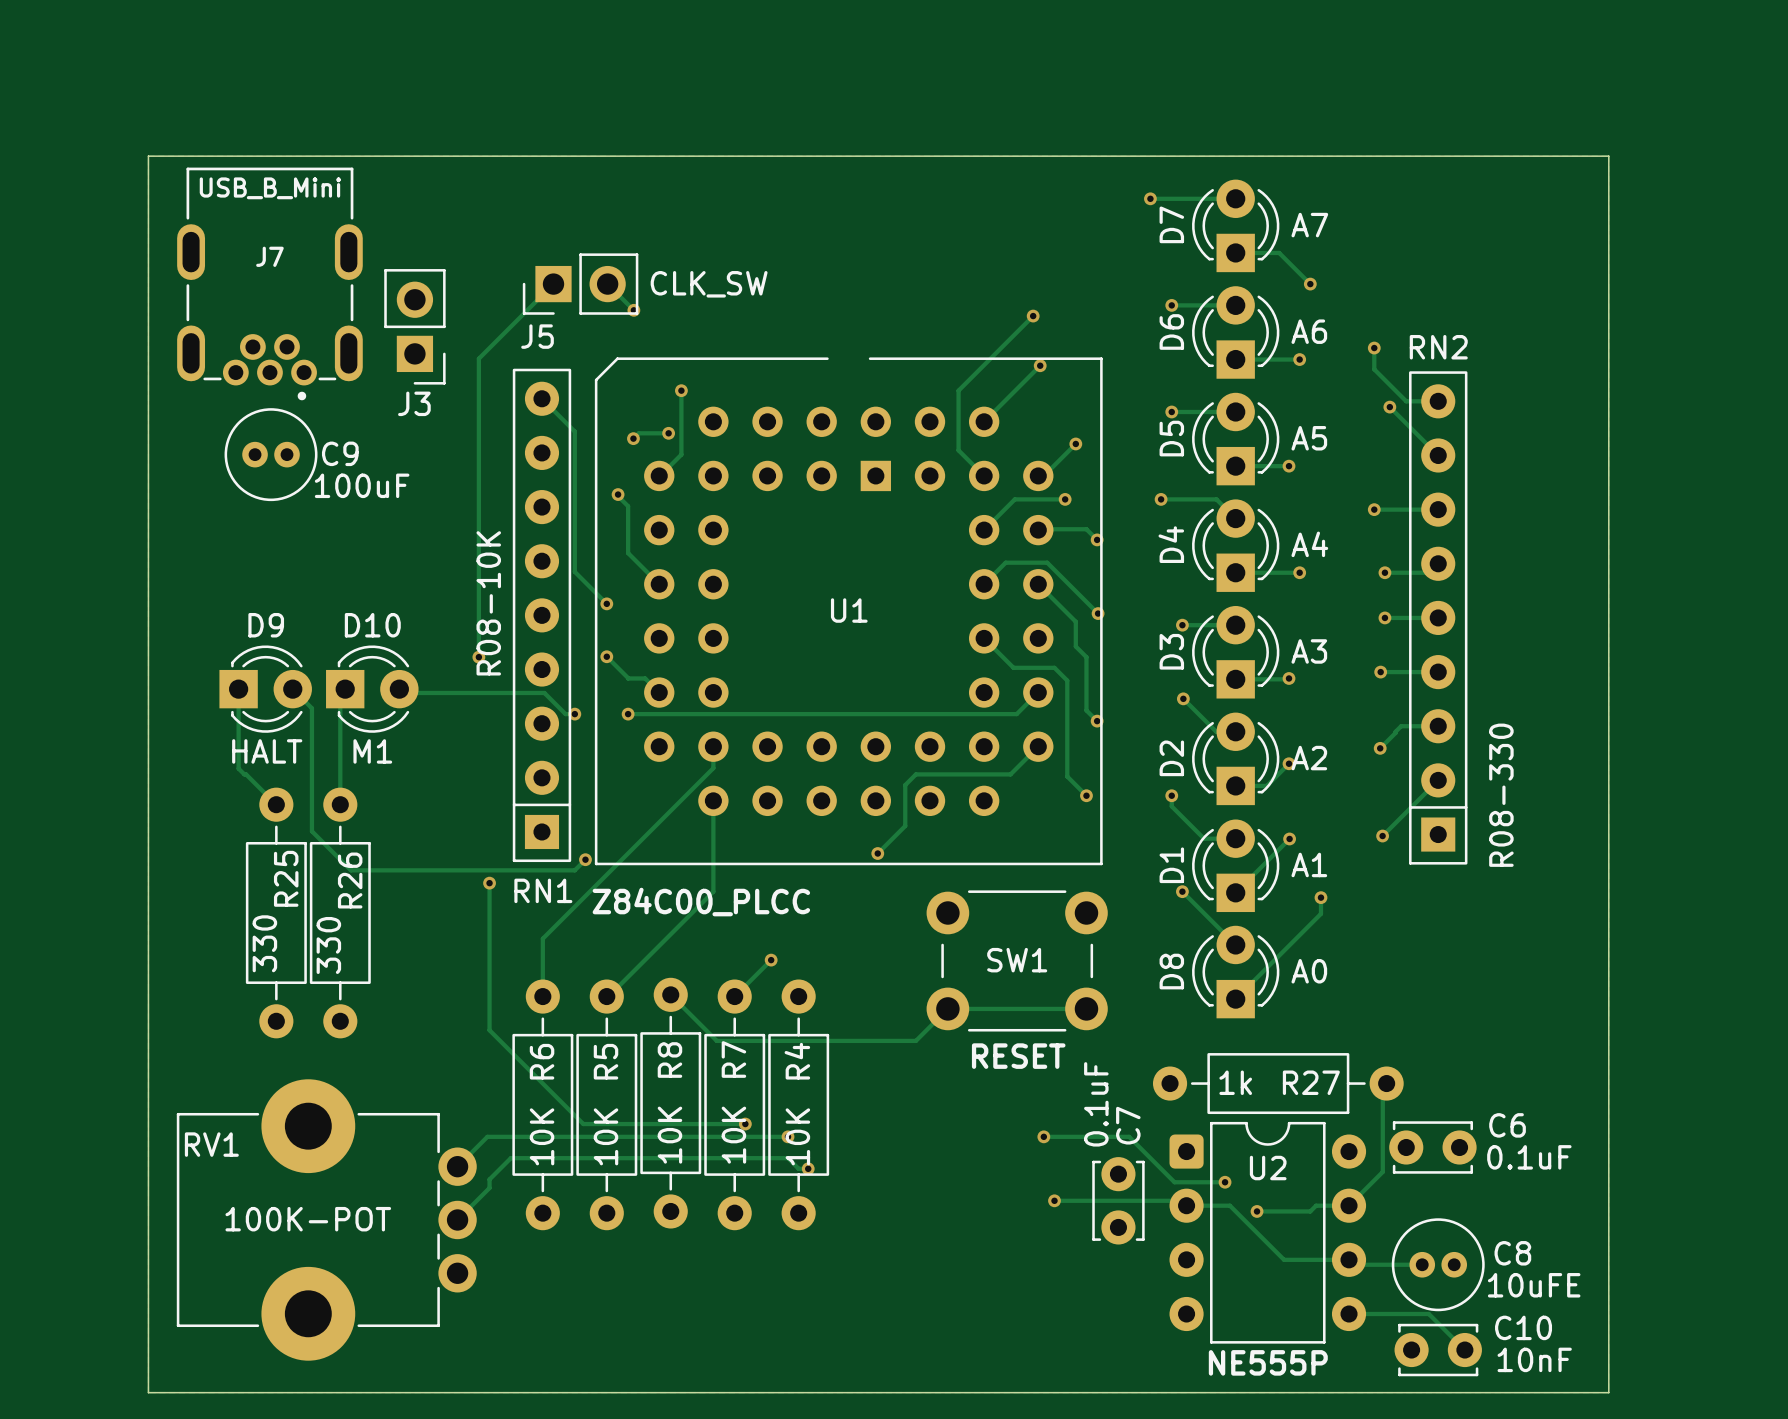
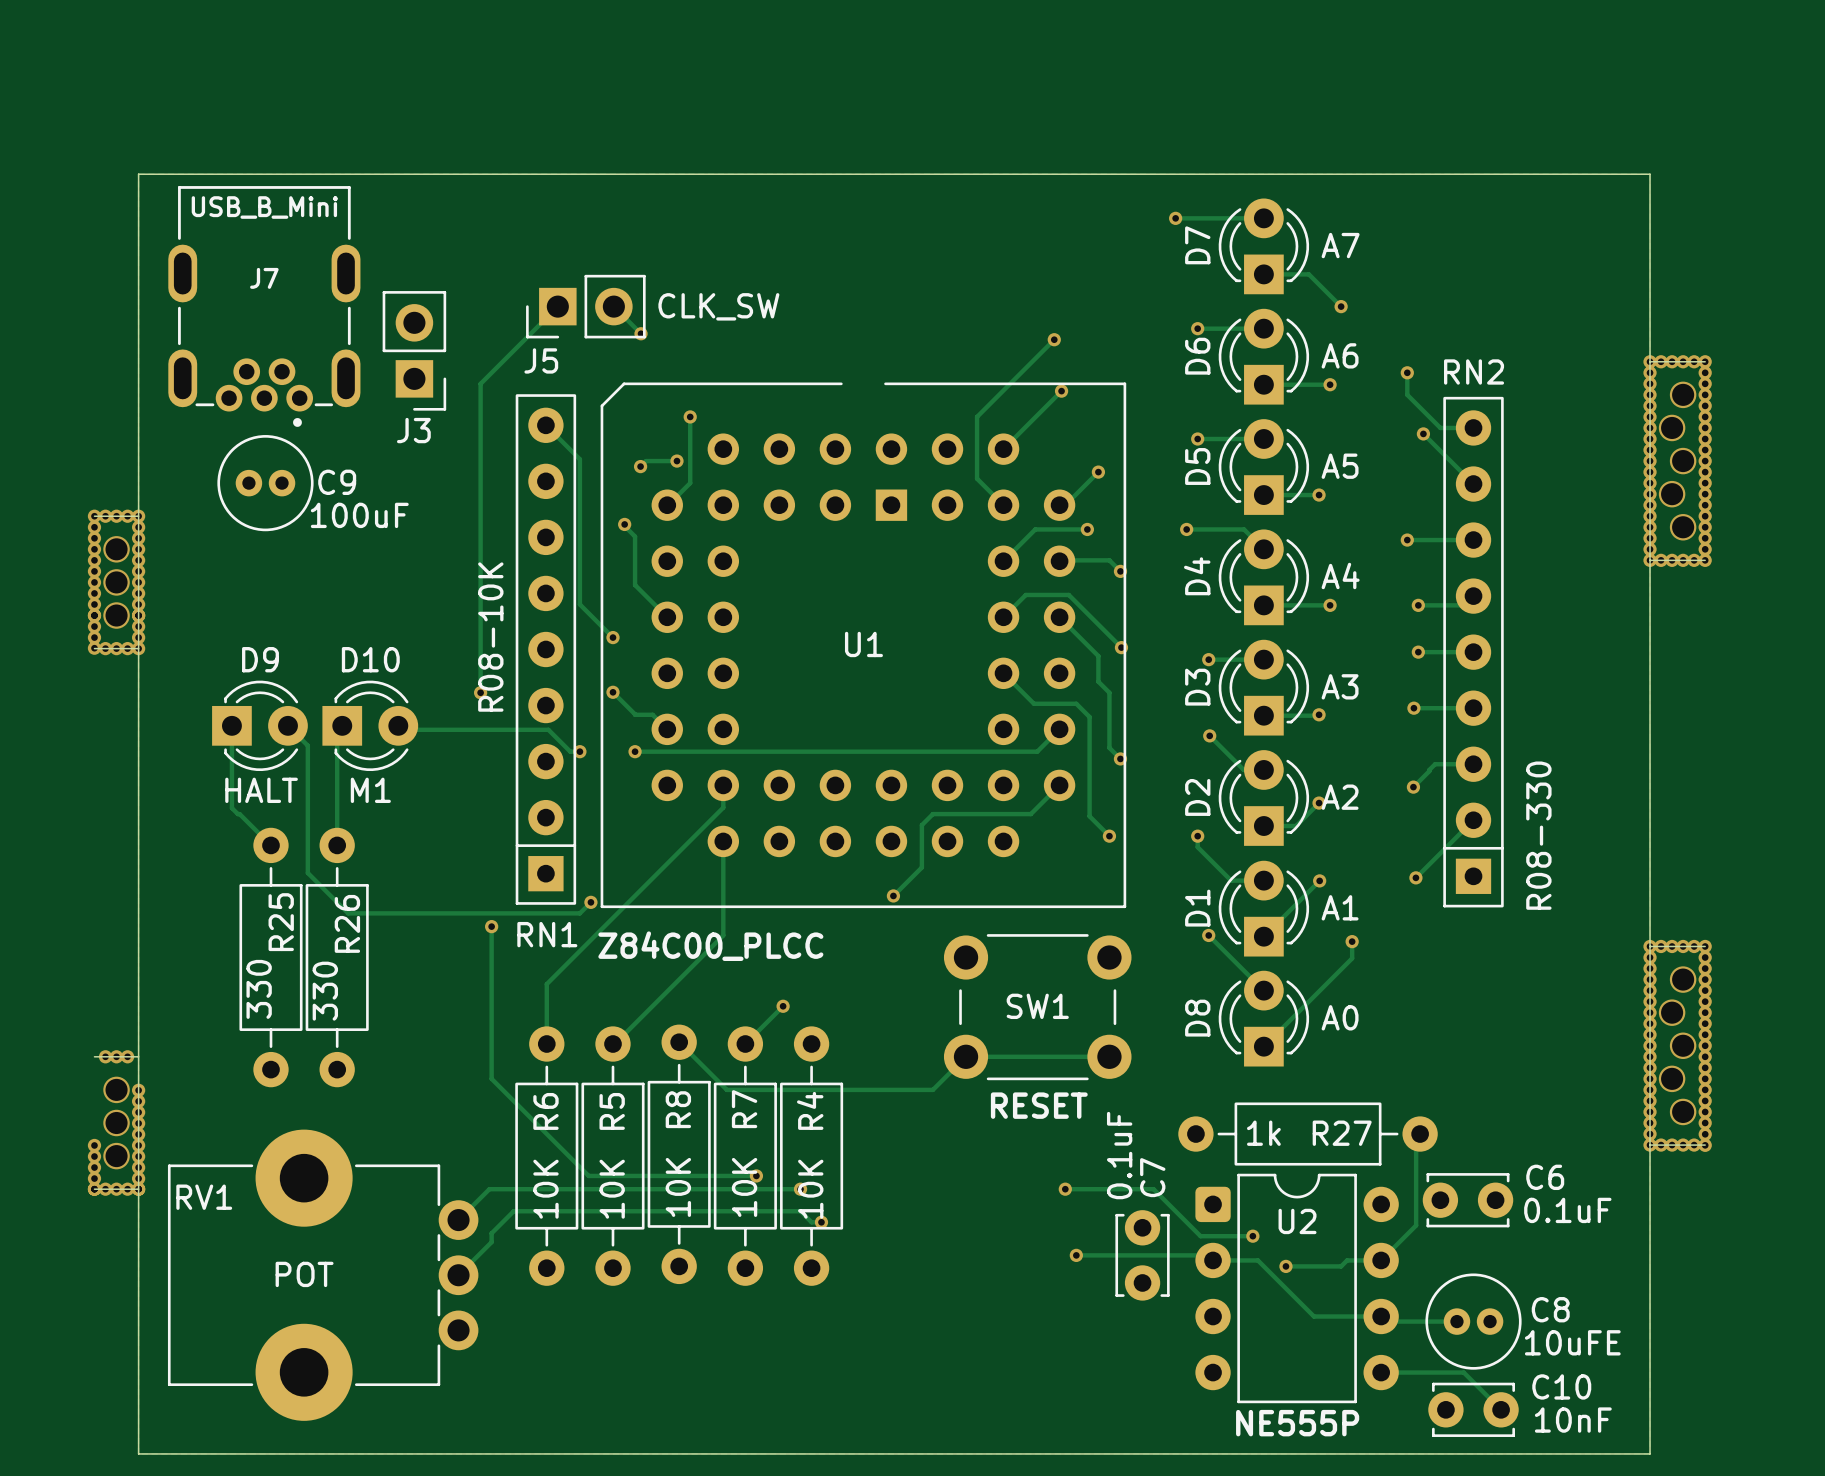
board edge: none -> (1650, 361) (1705, 361)
via: none -> (1650, 361)
via: none -> (1661, 361)
via: none -> (1672, 361)
via: none -> (1683, 361)
via: none -> (1694, 361)
via: none -> (1705, 361)
via: none -> (1650, 372)
via: none -> (1705, 372)
via: none -> (1650, 383)
via: none -> (1705, 383)
via: none -> (1650, 394)
via: none -> (1683, 394)
via: none -> (1705, 394)
via: none -> (1650, 405)
via: none -> (1705, 405)
via: none -> (1650, 416)
via: none -> (1705, 416)
via: none -> (1650, 427)
via: none -> (1672, 427)
via: none -> (1705, 427)
via: none -> (1650, 439)
via: none -> (1705, 439)
via: none -> (1650, 450)
via: none -> (1705, 450)
via: none -> (1650, 461)
via: none -> (1683, 461)
via: none -> (1705, 461)
via: none -> (1650, 472)
via: none -> (1705, 472)
via: none -> (1650, 483)
via: none -> (1705, 483)
via: none -> (1650, 494)
via: none -> (1672, 494)
via: none -> (1705, 494)
via: none -> (1650, 505)
via: none -> (1705, 505)
board edge: none -> (94, 516) (138, 516)
via: none -> (94, 516)
via: none -> (105, 516)
via: none -> (116, 516)
via: none -> (127, 516)
via: none -> (138, 516)
via: none -> (1650, 516)
via: none -> (1705, 516)
via: none -> (94, 527)
via: none -> (138, 527)
via: none -> (1650, 527)
via: none -> (1683, 527)
via: none -> (1705, 527)
via: none -> (94, 538)
via: none -> (138, 538)
via: none -> (1650, 538)
via: none -> (1705, 538)
via: none -> (94, 549)
via: none -> (116, 549)
via: none -> (138, 549)
via: none -> (1650, 549)
via: none -> (1705, 549)
via: none -> (94, 560)
via: none -> (138, 560)
board edge: none -> (1650, 560) (1705, 560)
via: none -> (1650, 560)
via: none -> (1661, 560)
via: none -> (1672, 560)
via: none -> (1683, 560)
via: none -> (1694, 560)
via: none -> (1705, 560)
via: none -> (94, 571)
via: none -> (138, 571)
via: none -> (94, 582)
via: none -> (116, 582)
via: none -> (138, 582)
via: none -> (94, 593)
via: none -> (138, 593)
via: none -> (94, 604)
via: none -> (138, 604)
via: none -> (94, 615)
via: none -> (116, 615)
via: none -> (138, 615)
via: none -> (94, 626)
via: none -> (138, 626)
via: none -> (94, 637)
via: none -> (138, 637)
board edge: none -> (94, 648) (138, 648)
via: none -> (94, 648)
via: none -> (105, 648)
via: none -> (116, 648)
via: none -> (127, 648)
via: none -> (138, 648)
board edge: none -> (1650, 946) (1705, 946)
via: none -> (1650, 946)
via: none -> (1661, 946)
via: none -> (1672, 946)
via: none -> (1683, 946)
via: none -> (1694, 946)
via: none -> (1705, 946)
via: none -> (1650, 957)
via: none -> (1705, 957)
via: none -> (1650, 968)
via: none -> (1705, 968)
via: none -> (1650, 979)
via: none -> (1683, 979)
via: none -> (1705, 979)
via: none -> (1650, 990)
via: none -> (1705, 990)
via: none -> (1650, 1001)
via: none -> (1705, 1001)
via: none -> (1650, 1012)
via: none -> (1672, 1012)
via: none -> (1705, 1012)
via: none -> (1650, 1023)
via: none -> (1705, 1023)
via: none -> (1650, 1034)
via: none -> (1705, 1034)
via: none -> (1650, 1045)
via: none -> (1683, 1045)
via: none -> (1705, 1045)
board edge: none -> (94, 1056) (138, 1056)
via: none -> (105, 1056)
via: none -> (116, 1056)
via: none -> (127, 1056)
via: none -> (1650, 1056)
via: none -> (1705, 1056)
via: none -> (1650, 1067)
via: none -> (1705, 1067)
via: none -> (1650, 1078)
via: none -> (1672, 1078)
via: none -> (1705, 1078)
via: none -> (116, 1089)
via: none -> (1650, 1089)
via: none -> (1705, 1089)
via: none -> (138, 1090)
via: none -> (138, 1101)
via: none -> (1650, 1100)
via: none -> (1705, 1100)
via: none -> (138, 1112)
via: none -> (1650, 1111)
via: none -> (1683, 1111)
via: none -> (1705, 1111)
via: none -> (116, 1123)
via: none -> (1650, 1123)
via: none -> (1705, 1123)
via: none -> (138, 1123)
via: none -> (138, 1134)
via: none -> (1650, 1134)
via: none -> (1705, 1134)
via: none -> (94, 1145)
via: none -> (138, 1145)
board edge: none -> (1650, 1145) (1705, 1145)
via: none -> (1650, 1145)
via: none -> (1661, 1145)
via: none -> (1672, 1145)
via: none -> (1683, 1145)
via: none -> (1694, 1145)
via: none -> (1705, 1145)
via: none -> (116, 1156)
via: none -> (94, 1156)
via: none -> (138, 1156)
via: none -> (94, 1167)
via: none -> (138, 1167)
via: none -> (94, 1178)
via: none -> (138, 1178)
board edge: none -> (94, 1189) (138, 1189)
via: none -> (94, 1189)
via: none -> (105, 1189)
via: none -> (116, 1189)
via: none -> (127, 1189)
via: none -> (138, 1189)
RV1 value: 100K-POT (308, 1219) -> POT (304, 1274)

